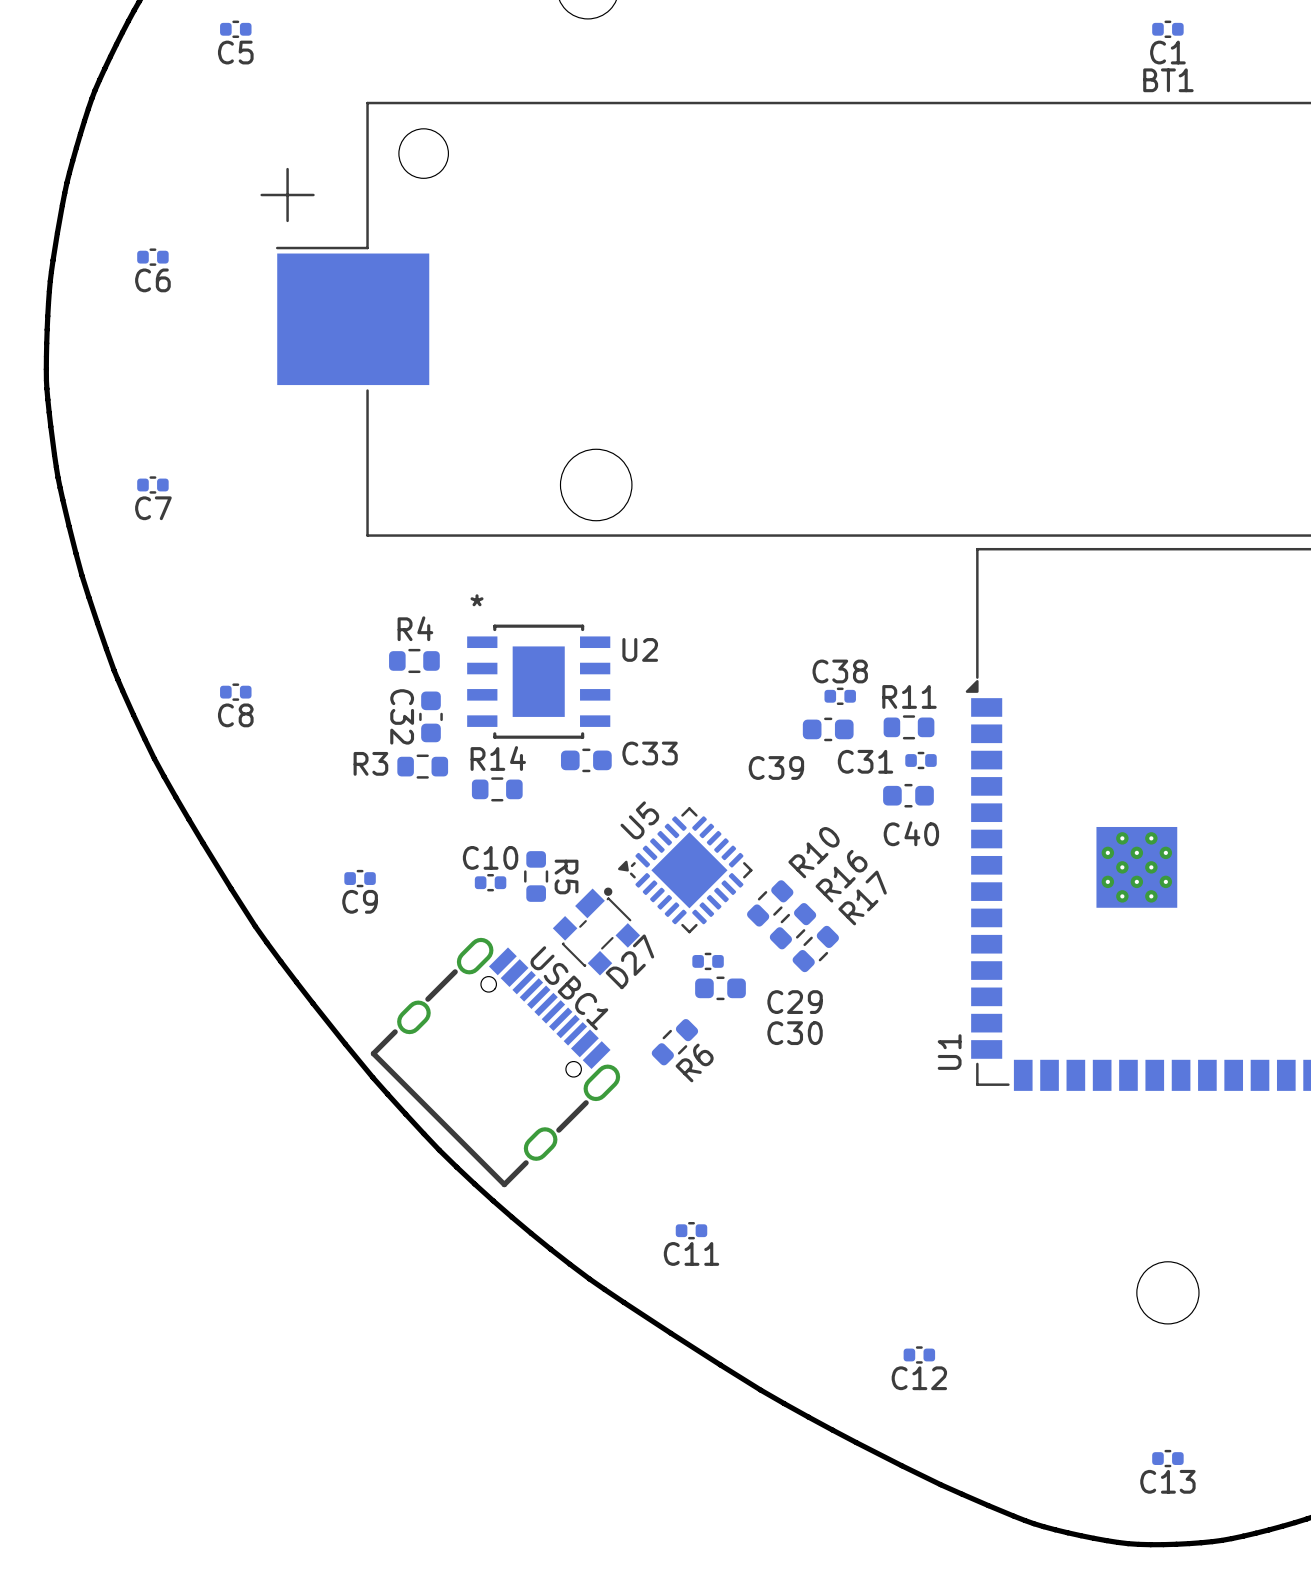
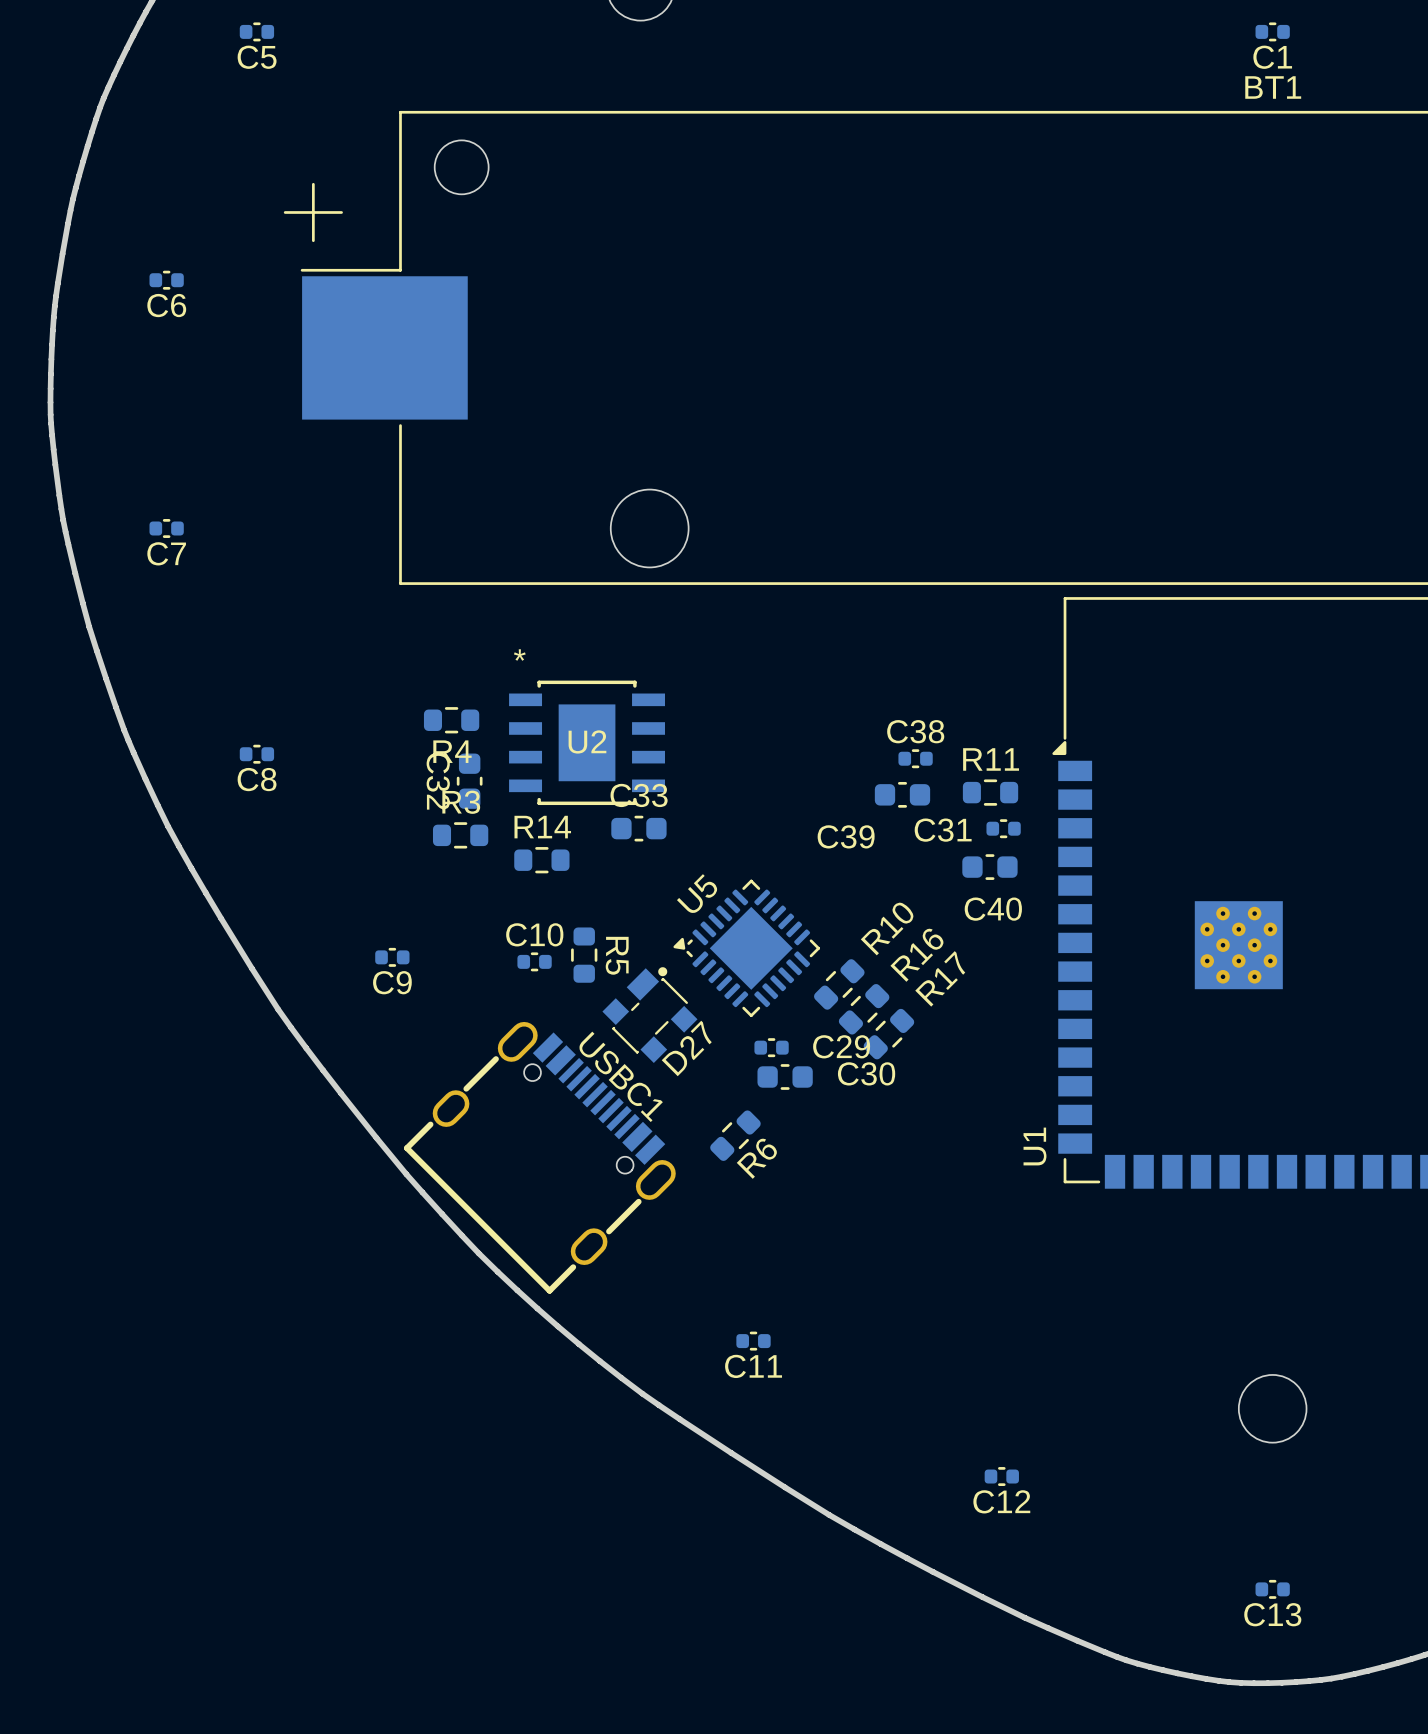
R4 name position: R4 (415, 628) -> R4 (452, 751)
U2 name position: U2 (640, 649) -> U2 (587, 741)
C33 name position: C33 (650, 753) -> C33 (639, 795)
R3 name position: R3 (370, 763) -> R3 (461, 802)
C29 name position: C29 (795, 1002) -> C29 (841, 1046)
C30 name position: C30 (795, 1033) -> C30 (866, 1073)

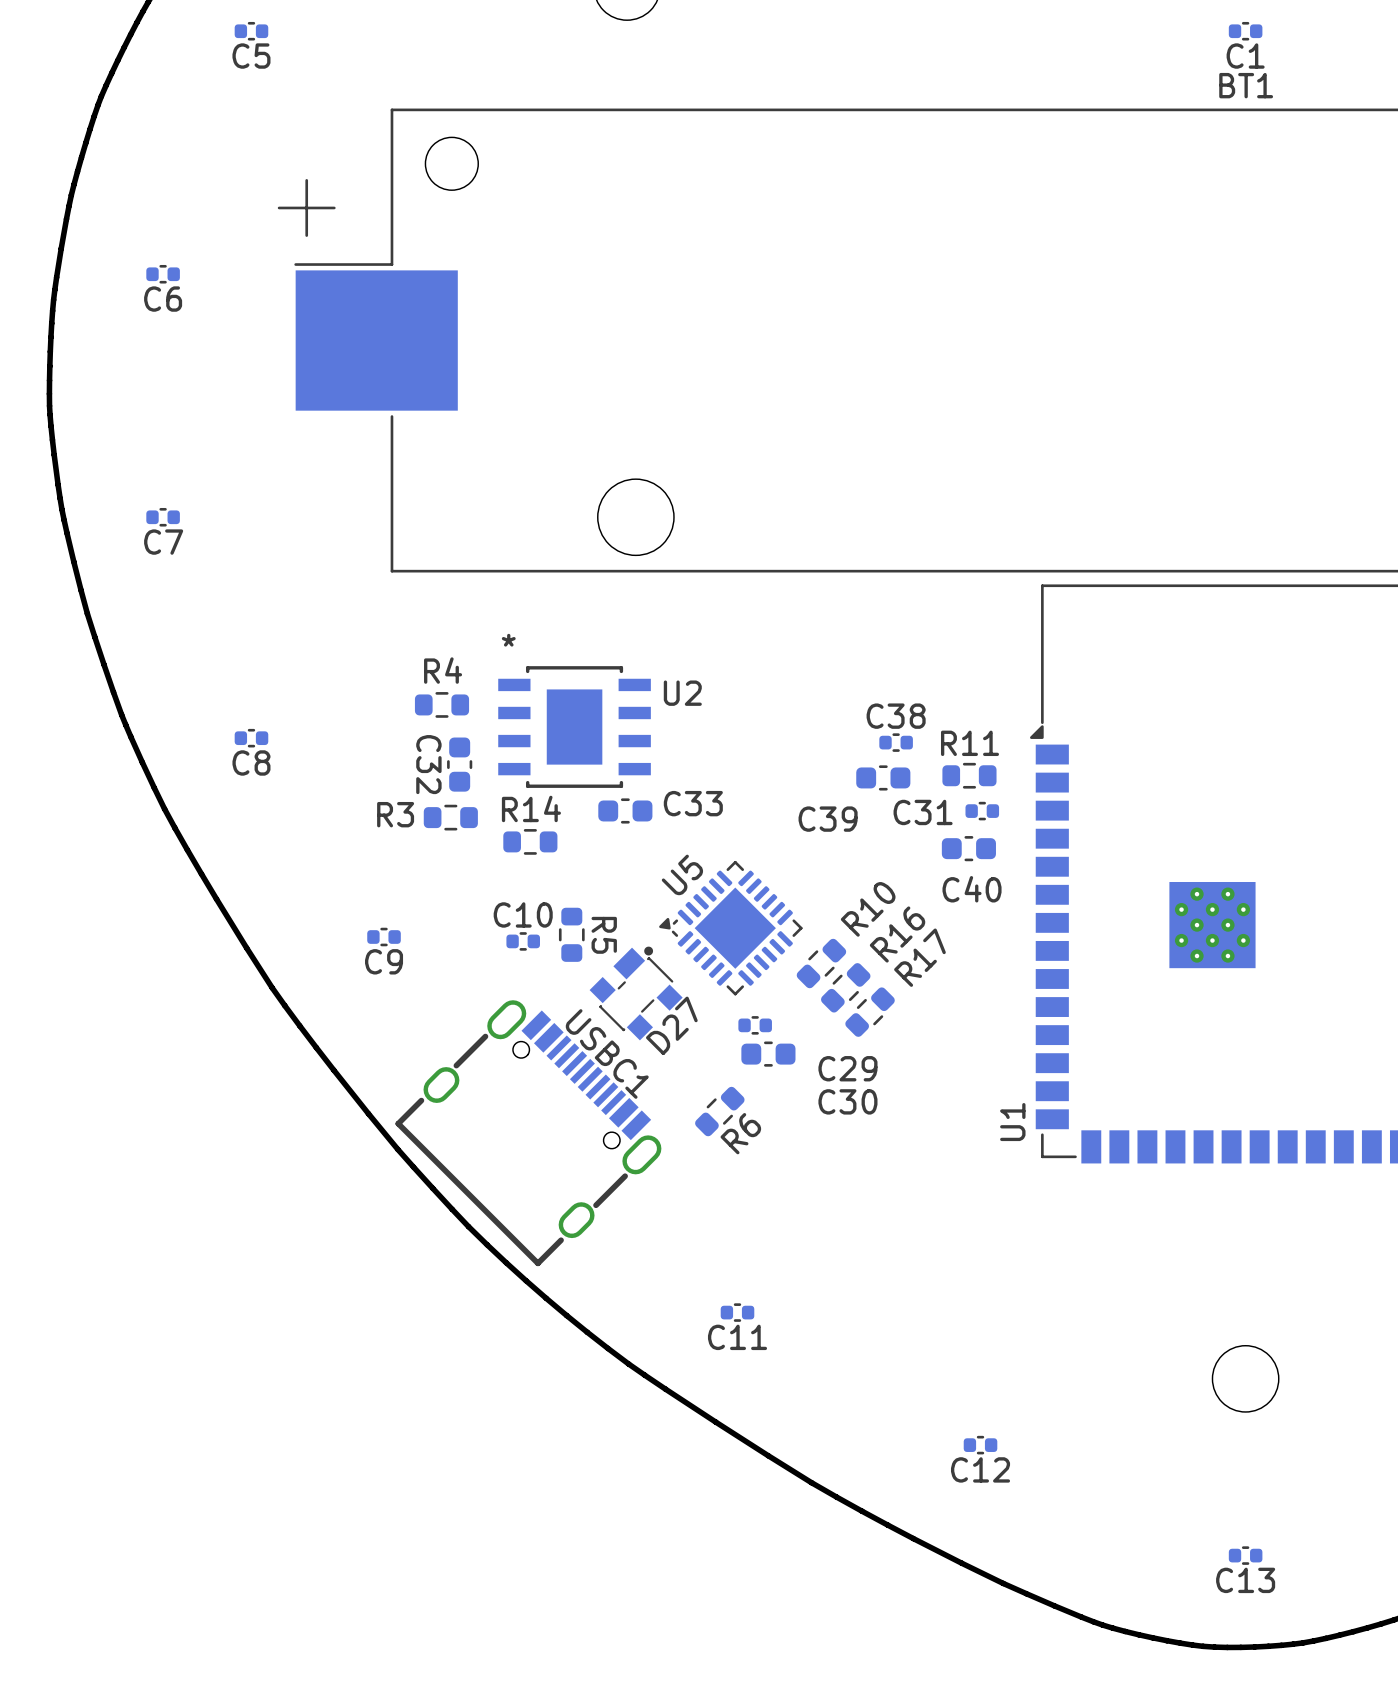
U2 name position: U2 (587, 741) -> U2 (682, 693)
R4 name position: R4 (452, 751) -> R4 (443, 670)
C33 name position: C33 (639, 795) -> C33 (693, 803)
R3 name position: R3 (461, 802) -> R3 (395, 814)
C29 name position: C29 (841, 1046) -> C29 (847, 1068)
C30 name position: C30 (866, 1073) -> C30 (847, 1101)

